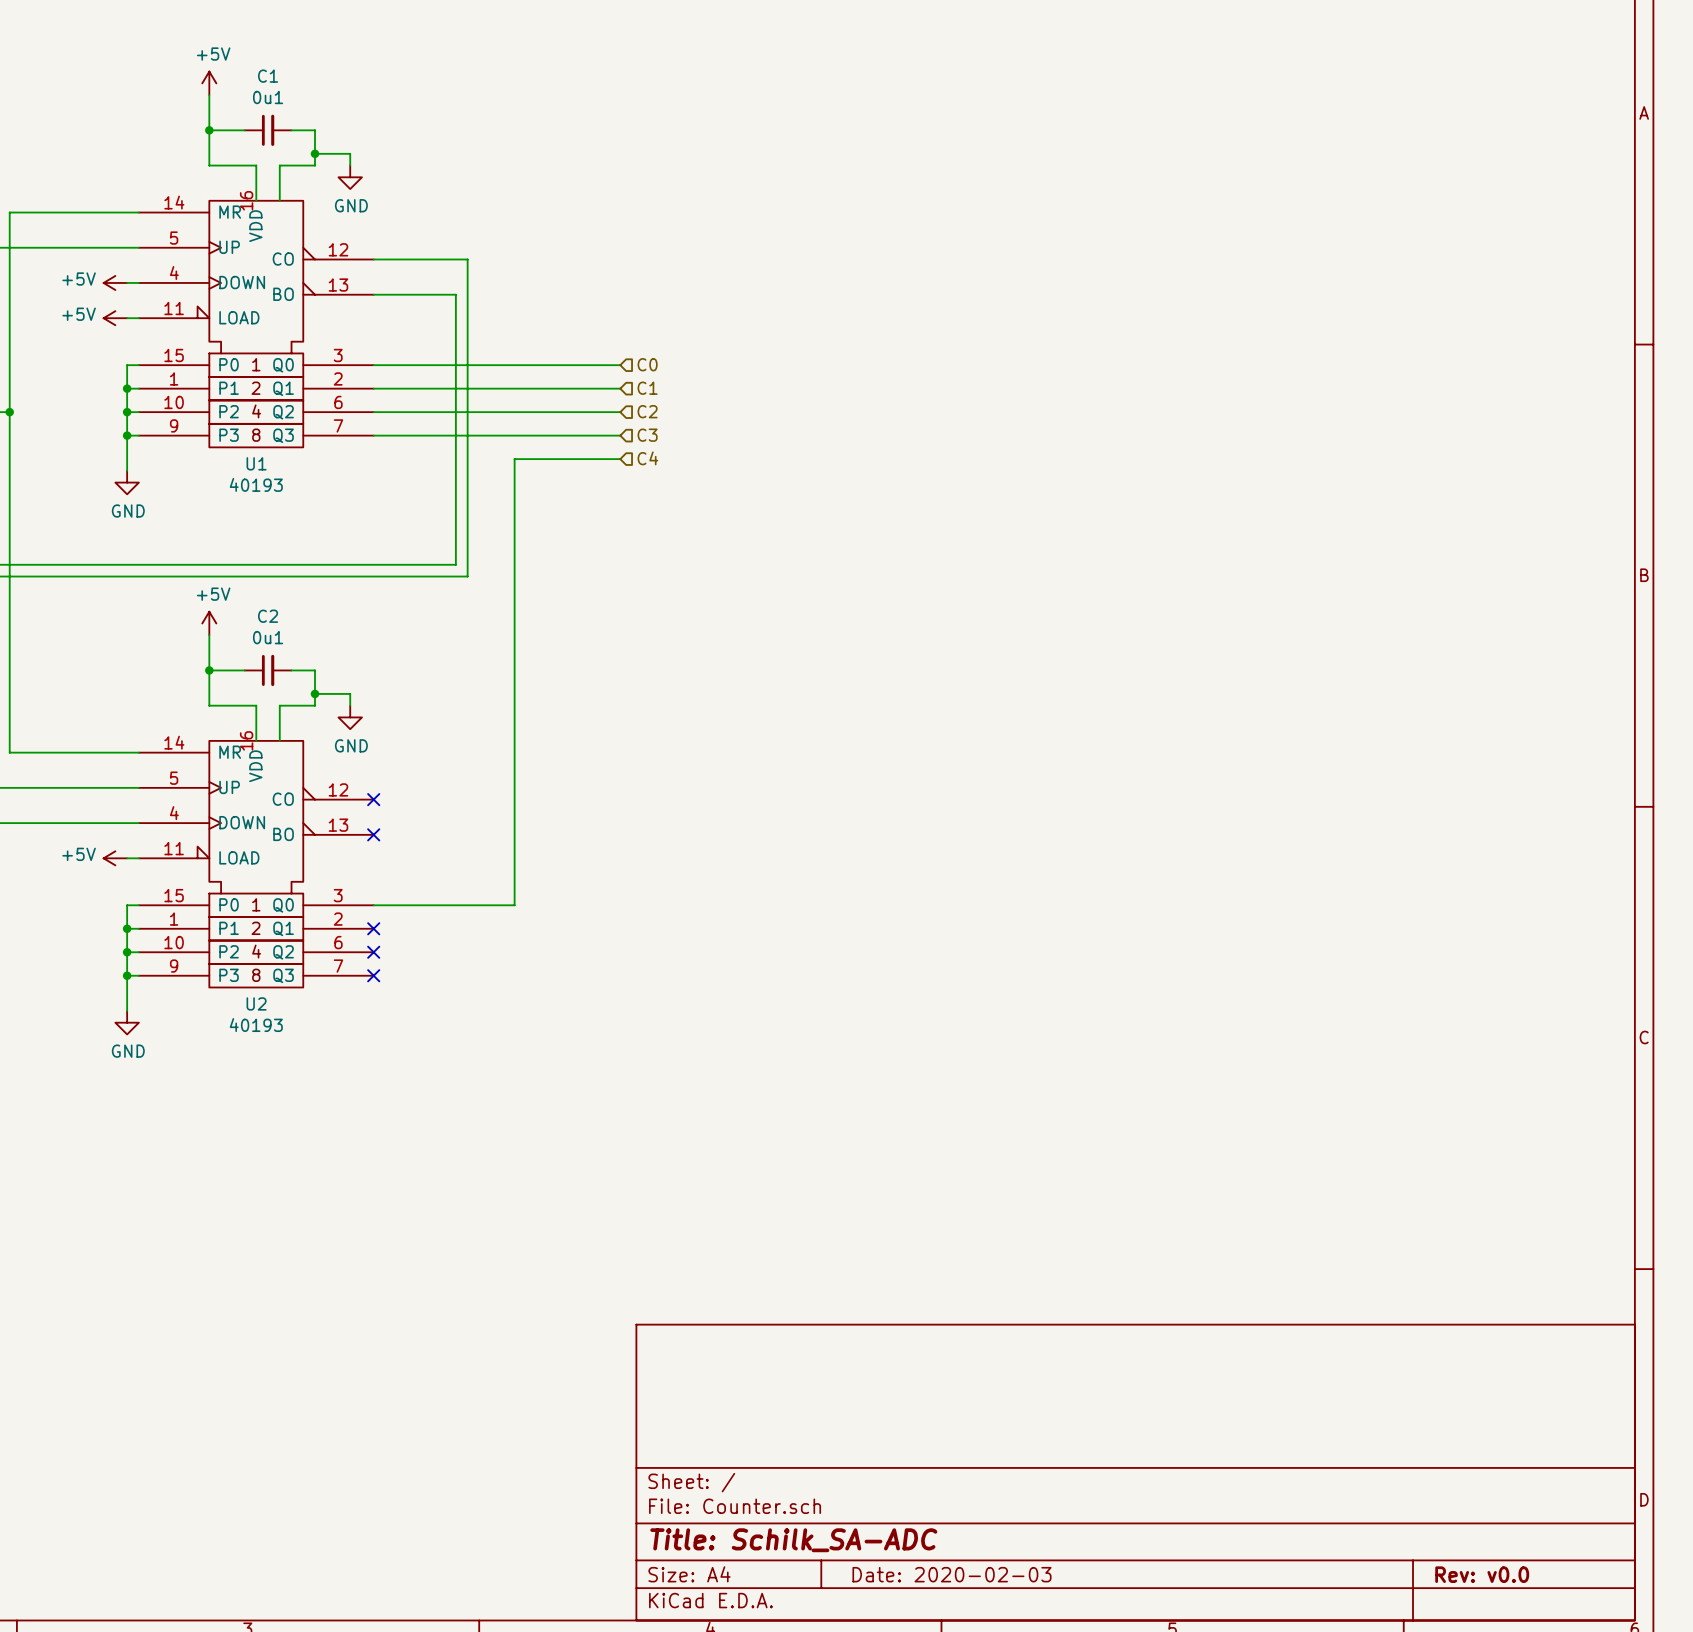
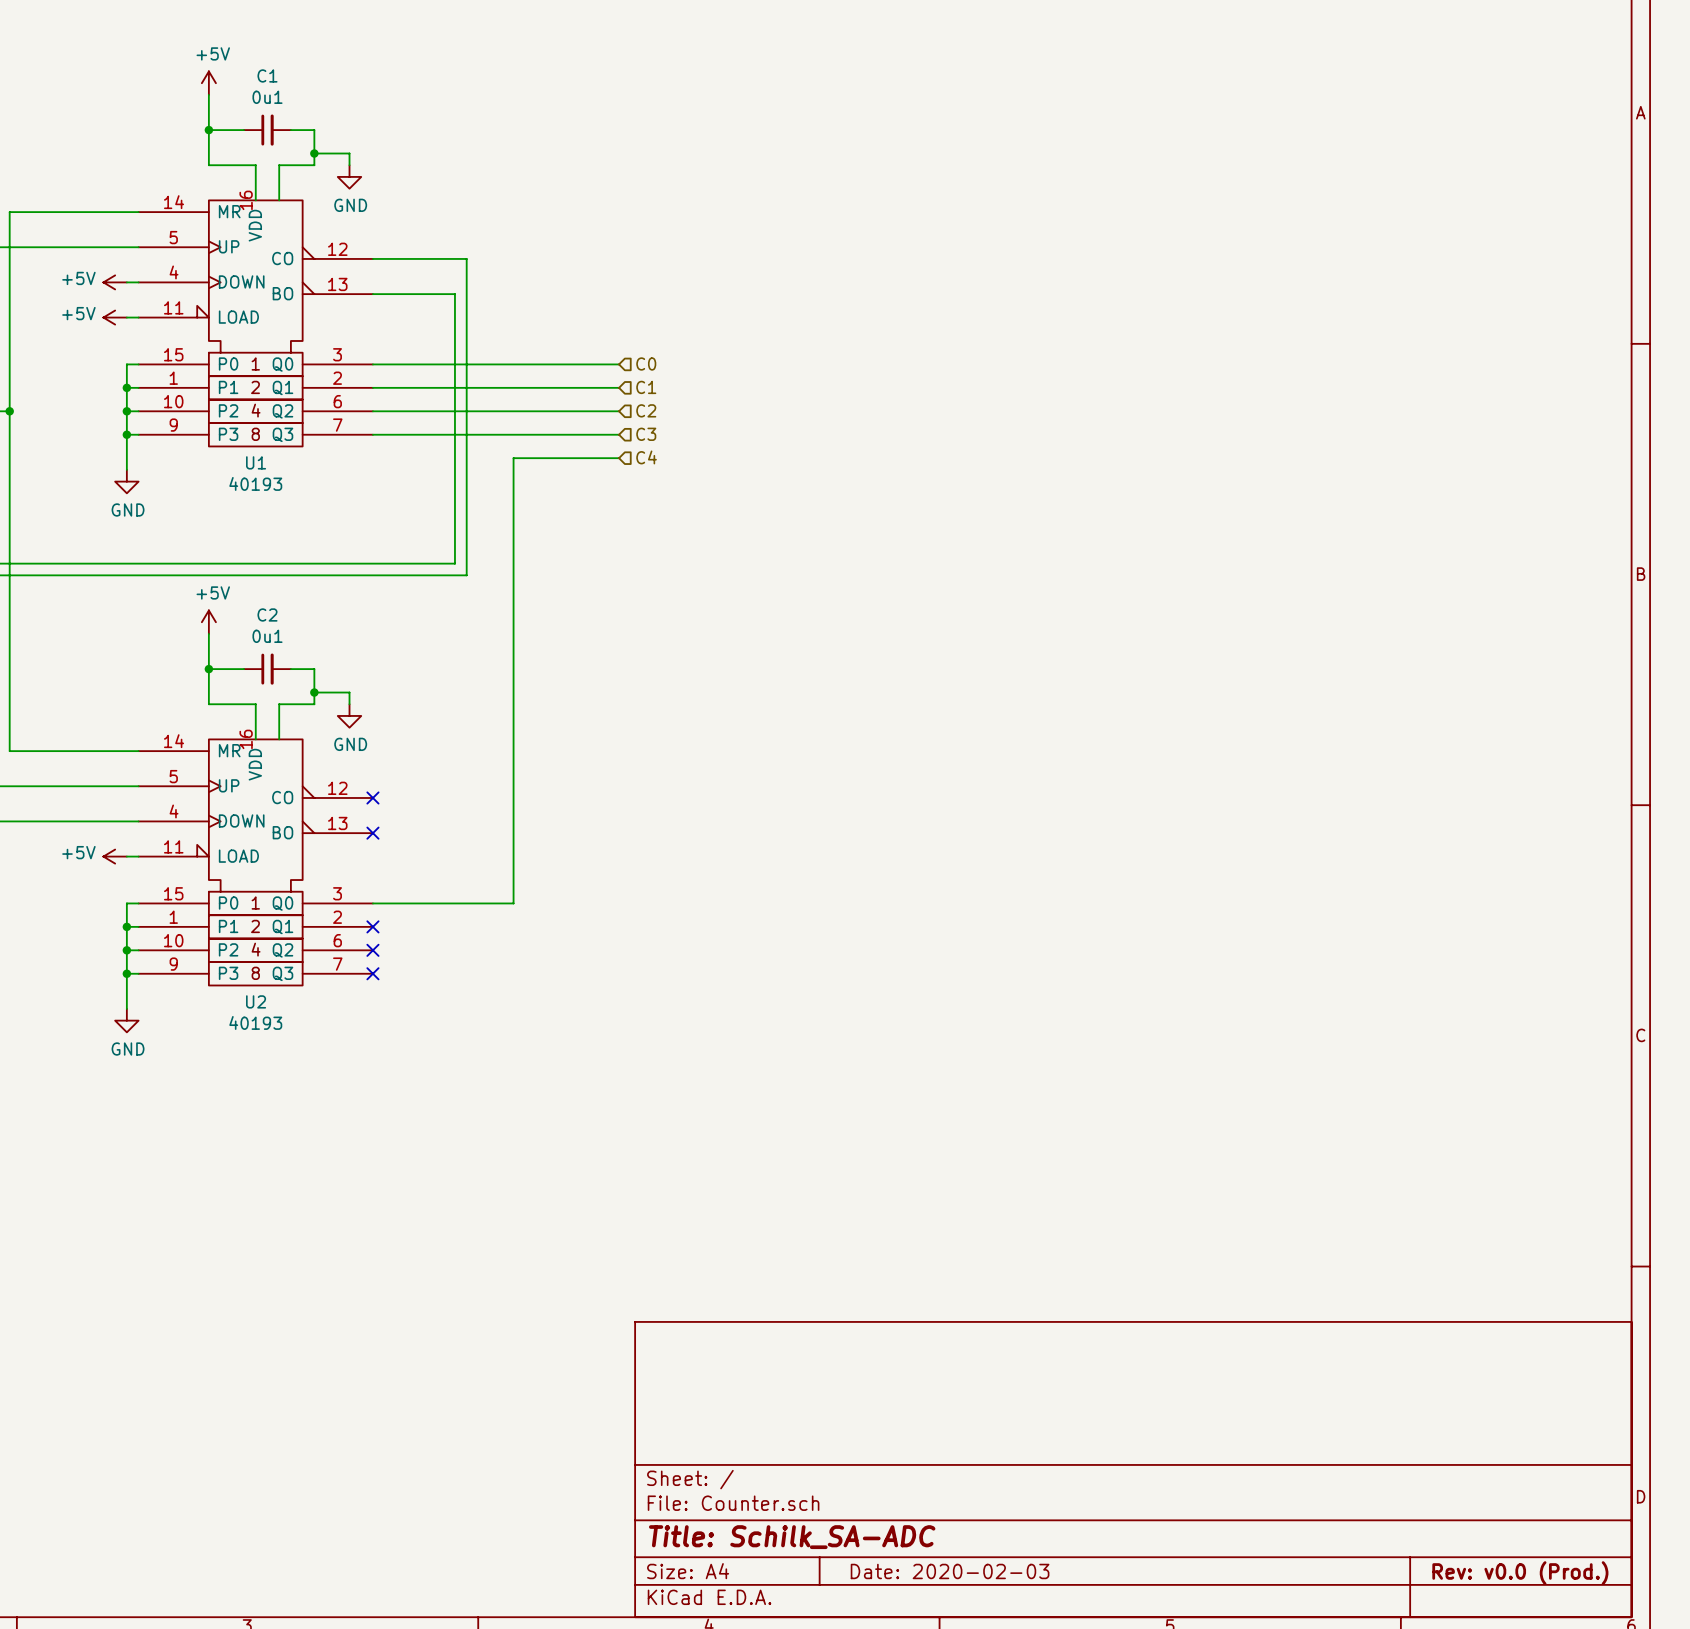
title block: Rev: v0.0 (1482, 1574) -> Rev: v0.0 (Prod.) (1520, 1573)

